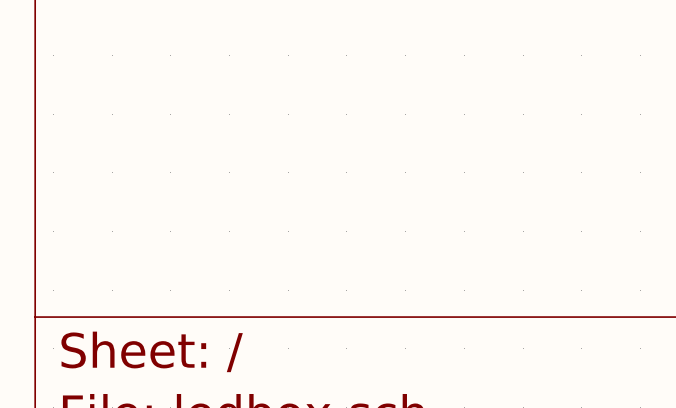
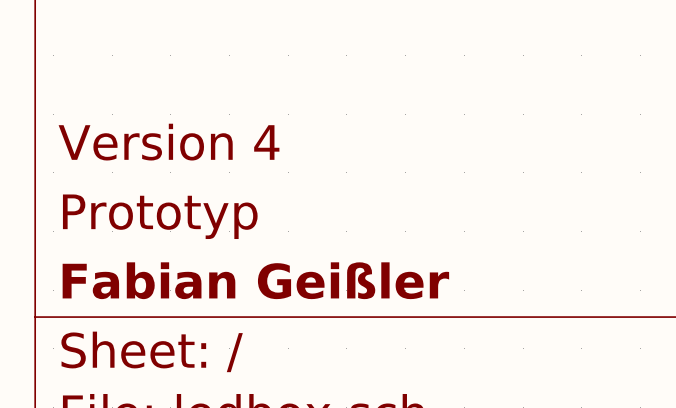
title block: none -> Version 4 (169, 142)
title block: none -> Prototyp (160, 216)
title block: none -> Fabian Geißler (255, 280)

